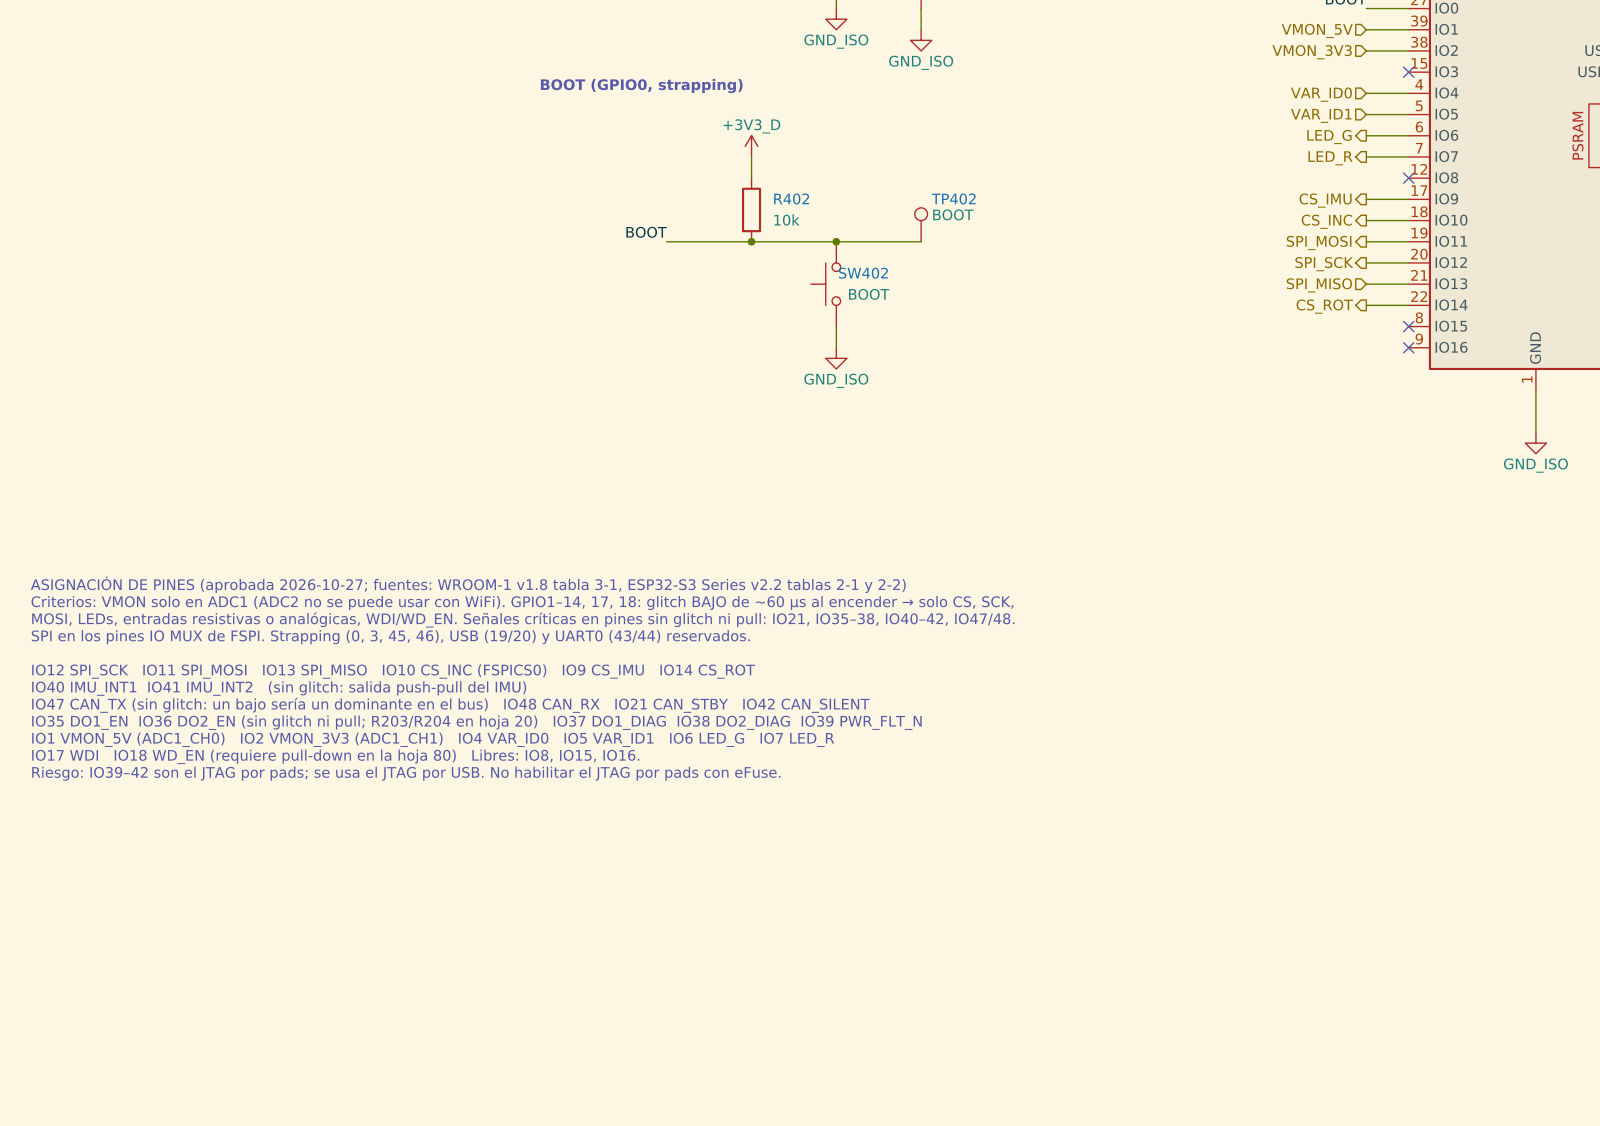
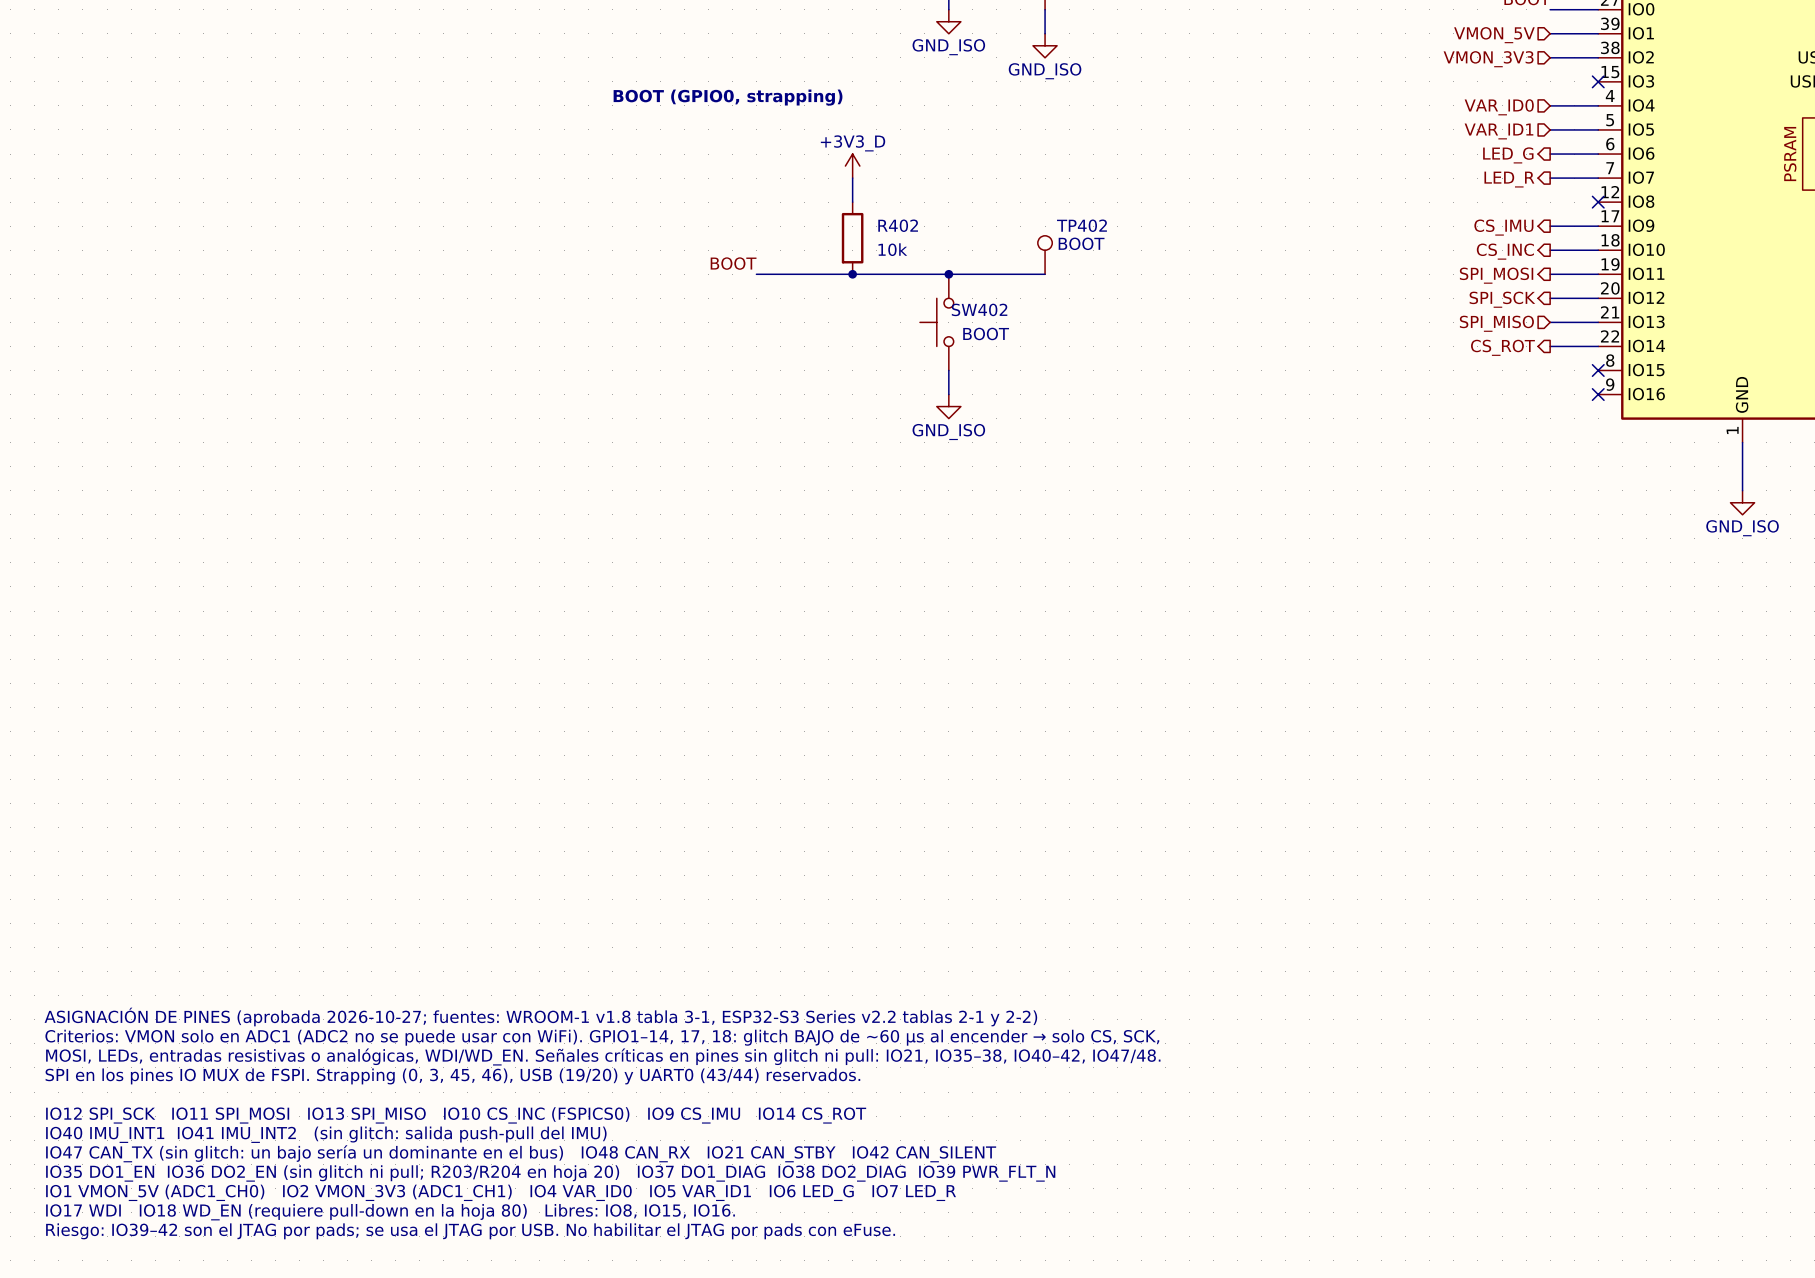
text: ASIGNACIÓN DE PINES (aprobada 2026-10-27; fuentes: WROOM-1 v1.8 tabla 3-1, ESP32-S3 Series v2.2 tablas 2-1 y 2-2) (468, 584) -> none
text: Criterios: VMON solo en ADC1 (ADC2 no se puede usar con WiFi). GPIO1–14, 17, 18: glitch BAJO de ~60 µs al encender → solo CS, SCK, (522, 603) -> none
text: MOSI, LEDs, entradas resistivas o analógicas, WDI/WD_EN. Señales críticas en pines sin glitch ni pull: IO21, IO35–38, IO40–42, IO47/48. (523, 620) -> none
text: SPI en los pines IO MUX de FSPI. Strapping (0, 3, 45, 46), USB (19/20) y UART0 (43/44) reservados. (390, 637) -> none
text: IO12 SPI_SCK IO11 SPI_MOSI IO13 SPI_MISO IO10 CS_INC (FSPICS0) IO9 CS_IMU IO14 CS_ROT (393, 671) -> none
text: IO40 IMU_INT1 IO41 IMU_INT2 (sin glitch: salida push-pull del IMU) (279, 688) -> none
text: IO47 CAN_TX (sin glitch: un bajo sería un dominante en el bus) IO48 CAN_RX IO21 CAN_STBY IO42 CAN_SILENT (450, 705) -> none
text: IO35 DO1_EN IO36 DO2_EN (sin glitch ni pull; R203/R204 en hoja 20) IO37 DO1_DIAG IO38 DO2_DIAG IO39 PWR_FLT_N (476, 722) -> none
text: IO1 VMON_5V (ADC1_CH0) IO2 VMON_3V3 (ADC1_CH1) IO4 VAR_ID0 IO5 VAR_ID1 IO6 LED_G IO7 LED_R (433, 739) -> none
text: IO17 WDI IO18 WD_EN (requiere pull-down en la hoja 80) Libres: IO8, IO15, IO16. (335, 756) -> none
text: Riesgo: IO39–42 son el JTAG por pads; se usa el JTAG por USB. No habilitar el JTAG por pads con eFuse. (406, 773) -> none
text: none -> ASIGNACIÓN DE PINES (aprobada 2026-10-27; fuentes: WROOM-1 v1.8 tabla 3-1, ESP32-S3 Series v2.2 tablas 2-1 y 2-2) (540, 1016)
text: none -> Criterios: VMON solo en ADC1 (ADC2 no se puede usar con WiFi). GPIO1–14, 17, 18: glitch BAJO de ~60 µs al encender → solo CS, SCK, (602, 1037)
text: none -> MOSI, LEDs, entradas resistivas o analógicas, WDI/WD_EN. Señales críticas en pines sin glitch ni pull: IO21, IO35–38, IO40–42, IO47/48. (603, 1056)
text: none -> SPI en los pines IO MUX de FSPI. Strapping (0, 3, 45, 46), USB (19/20) y UART0 (43/44) reservados. (452, 1076)
text: none -> IO12 SPI_SCK IO11 SPI_MOSI IO13 SPI_MISO IO10 CS_INC (FSPICS0) IO9 CS_IMU IO14 CS_ROT (456, 1115)
text: none -> IO40 IMU_INT1 IO41 IMU_INT2 (sin glitch: salida push-pull del IMU) (326, 1134)
text: none -> IO47 CAN_TX (sin glitch: un bajo sería un dominante en el bus) IO48 CAN_RX IO21 CAN_STBY IO42 CAN_SILENT (521, 1153)
text: none -> IO35 DO1_EN IO36 DO2_EN (sin glitch ni pull; R203/R204 en hoja 20) IO37 DO1_DIAG IO38 DO2_DIAG IO39 PWR_FLT_N (550, 1173)
text: none -> IO1 VMON_5V (ADC1_CH0) IO2 VMON_3V3 (ADC1_CH1) IO4 VAR_ID0 IO5 VAR_ID1 IO6 LED_G IO7 LED_R (501, 1192)
text: none -> IO17 WDI IO18 WD_EN (requiere pull-down en la hoja 80) Libres: IO8, IO15, IO16. (390, 1212)
text: none -> Riesgo: IO39–42 son el JTAG por pads; se usa el JTAG por USB. No habilitar el JTAG por pads con eFuse. (470, 1231)

